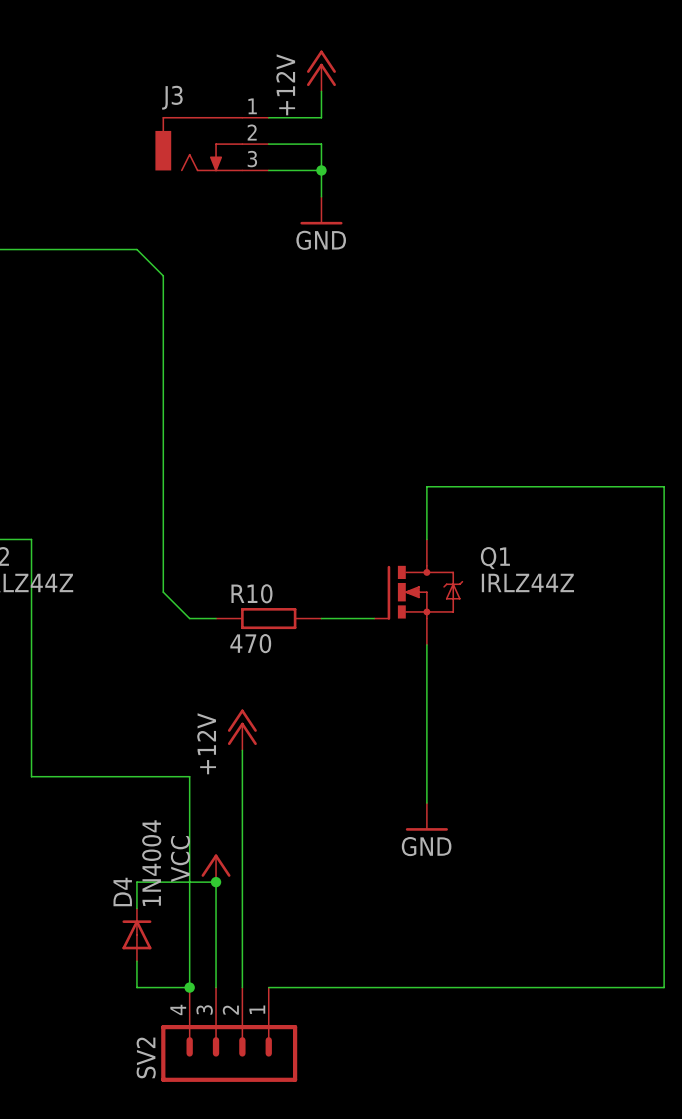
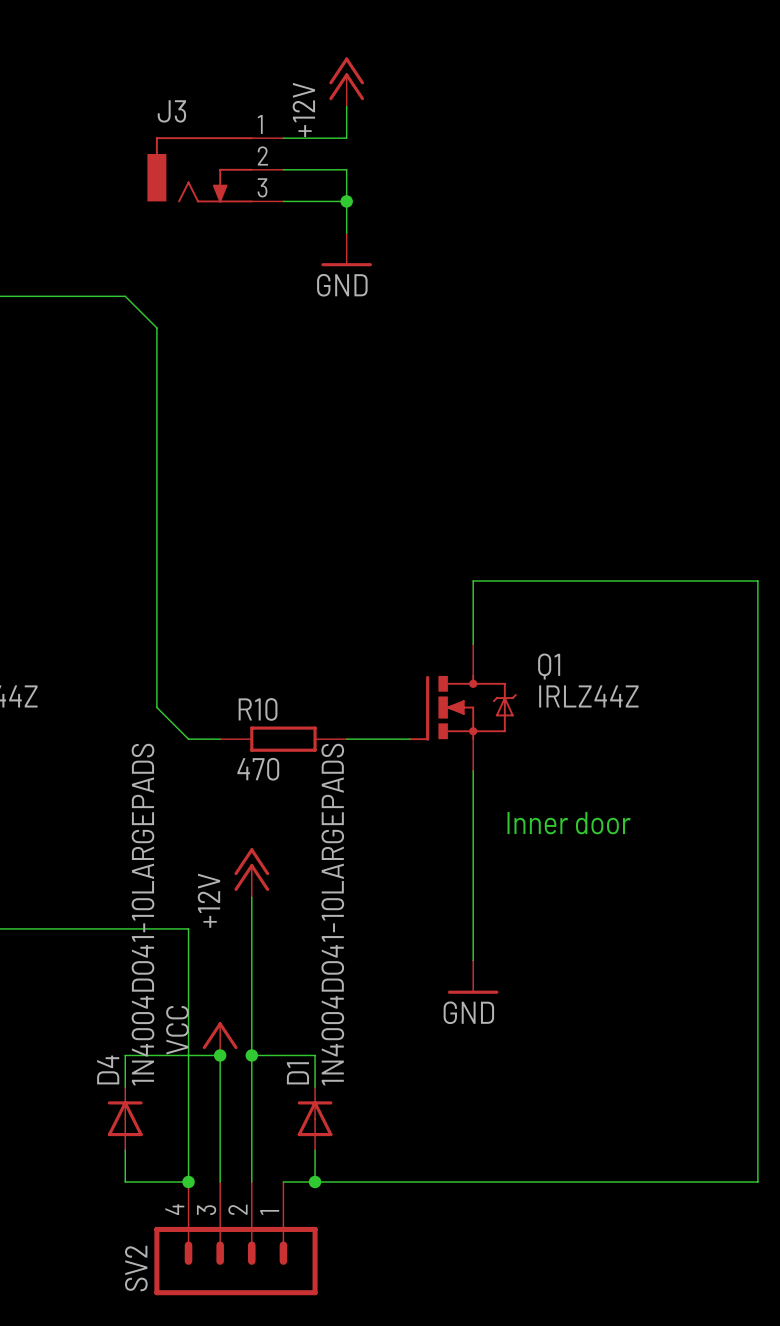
text: none -> Inner door (569, 823)
D4 value: 1N4004 (151, 863) -> 1N4004DO41-10LARGEPADS (142, 914)
wire: none -> (251, 1055) (315, 1055) (315, 1087)
junction: none -> (251, 1055)
D1: none -> 1N4004DO41-10LARGEPADS (315, 1118)
wire: none -> (315, 1150) (315, 1181)
junction: none -> (315, 1181)

